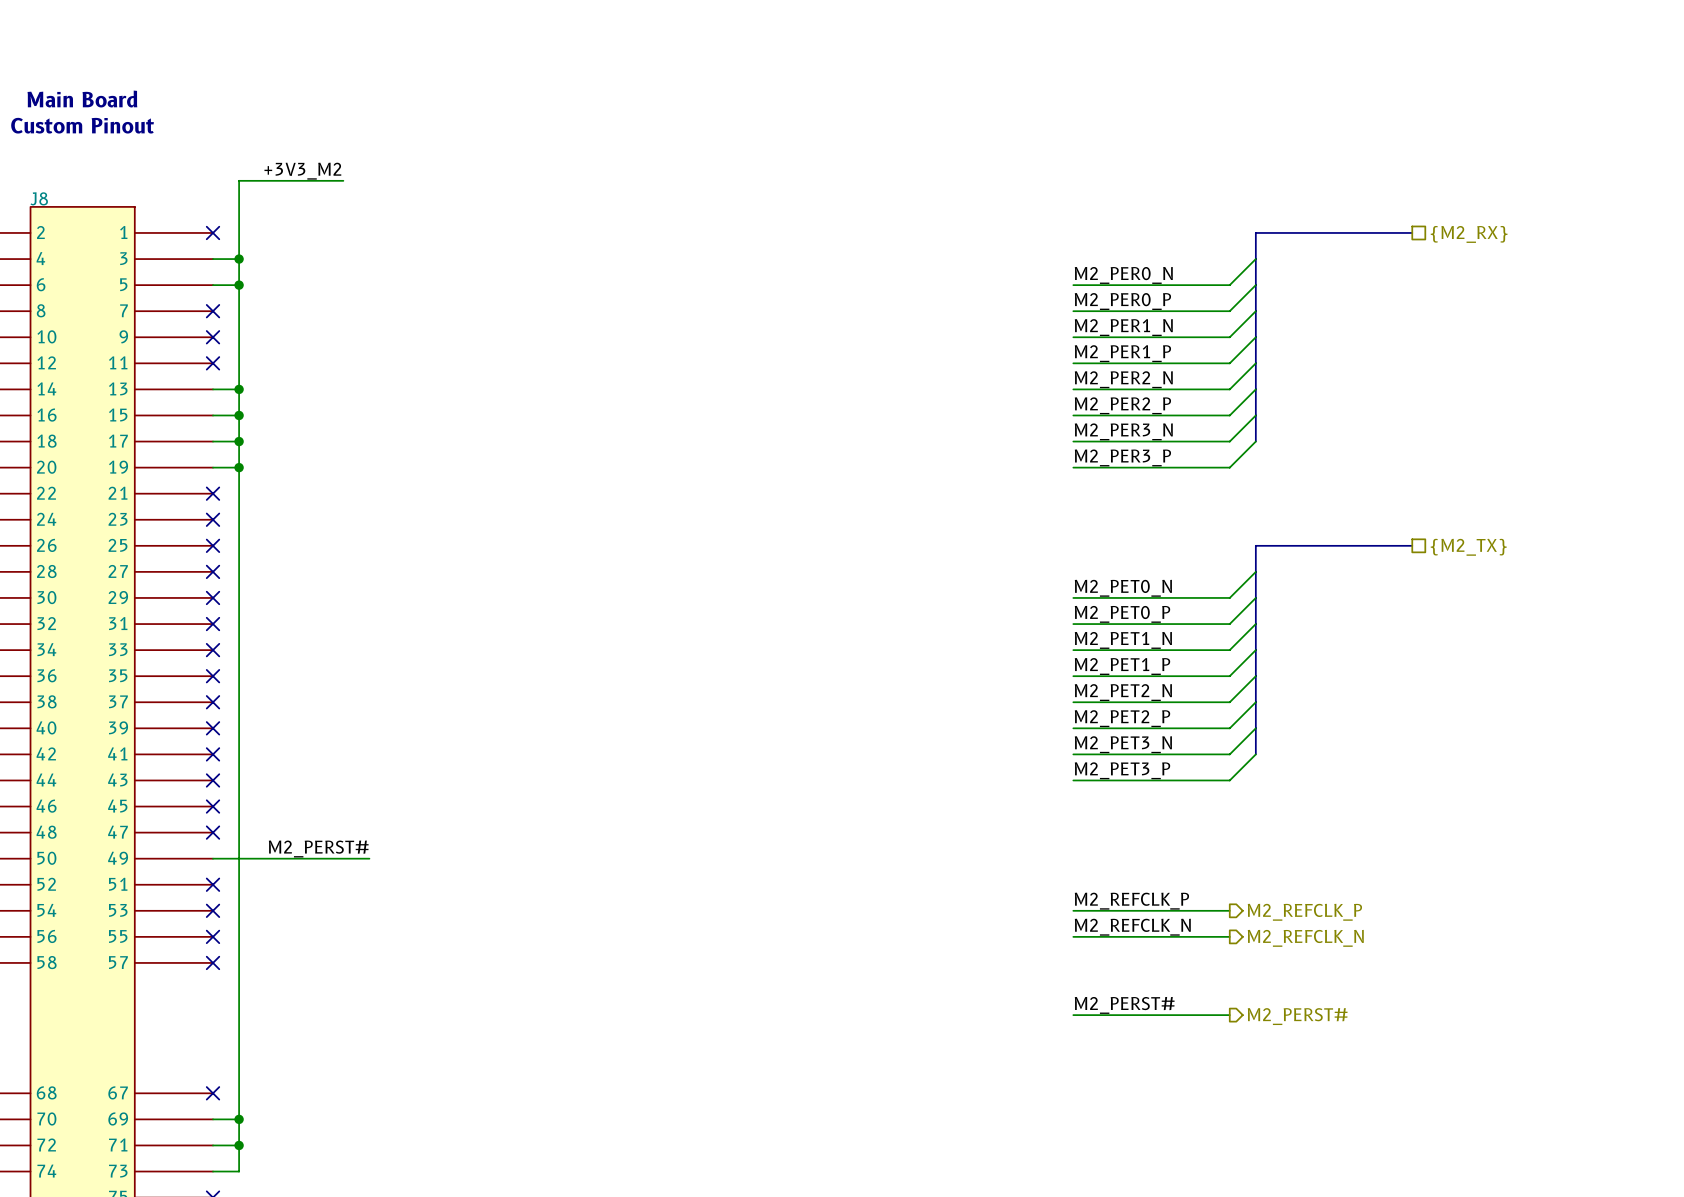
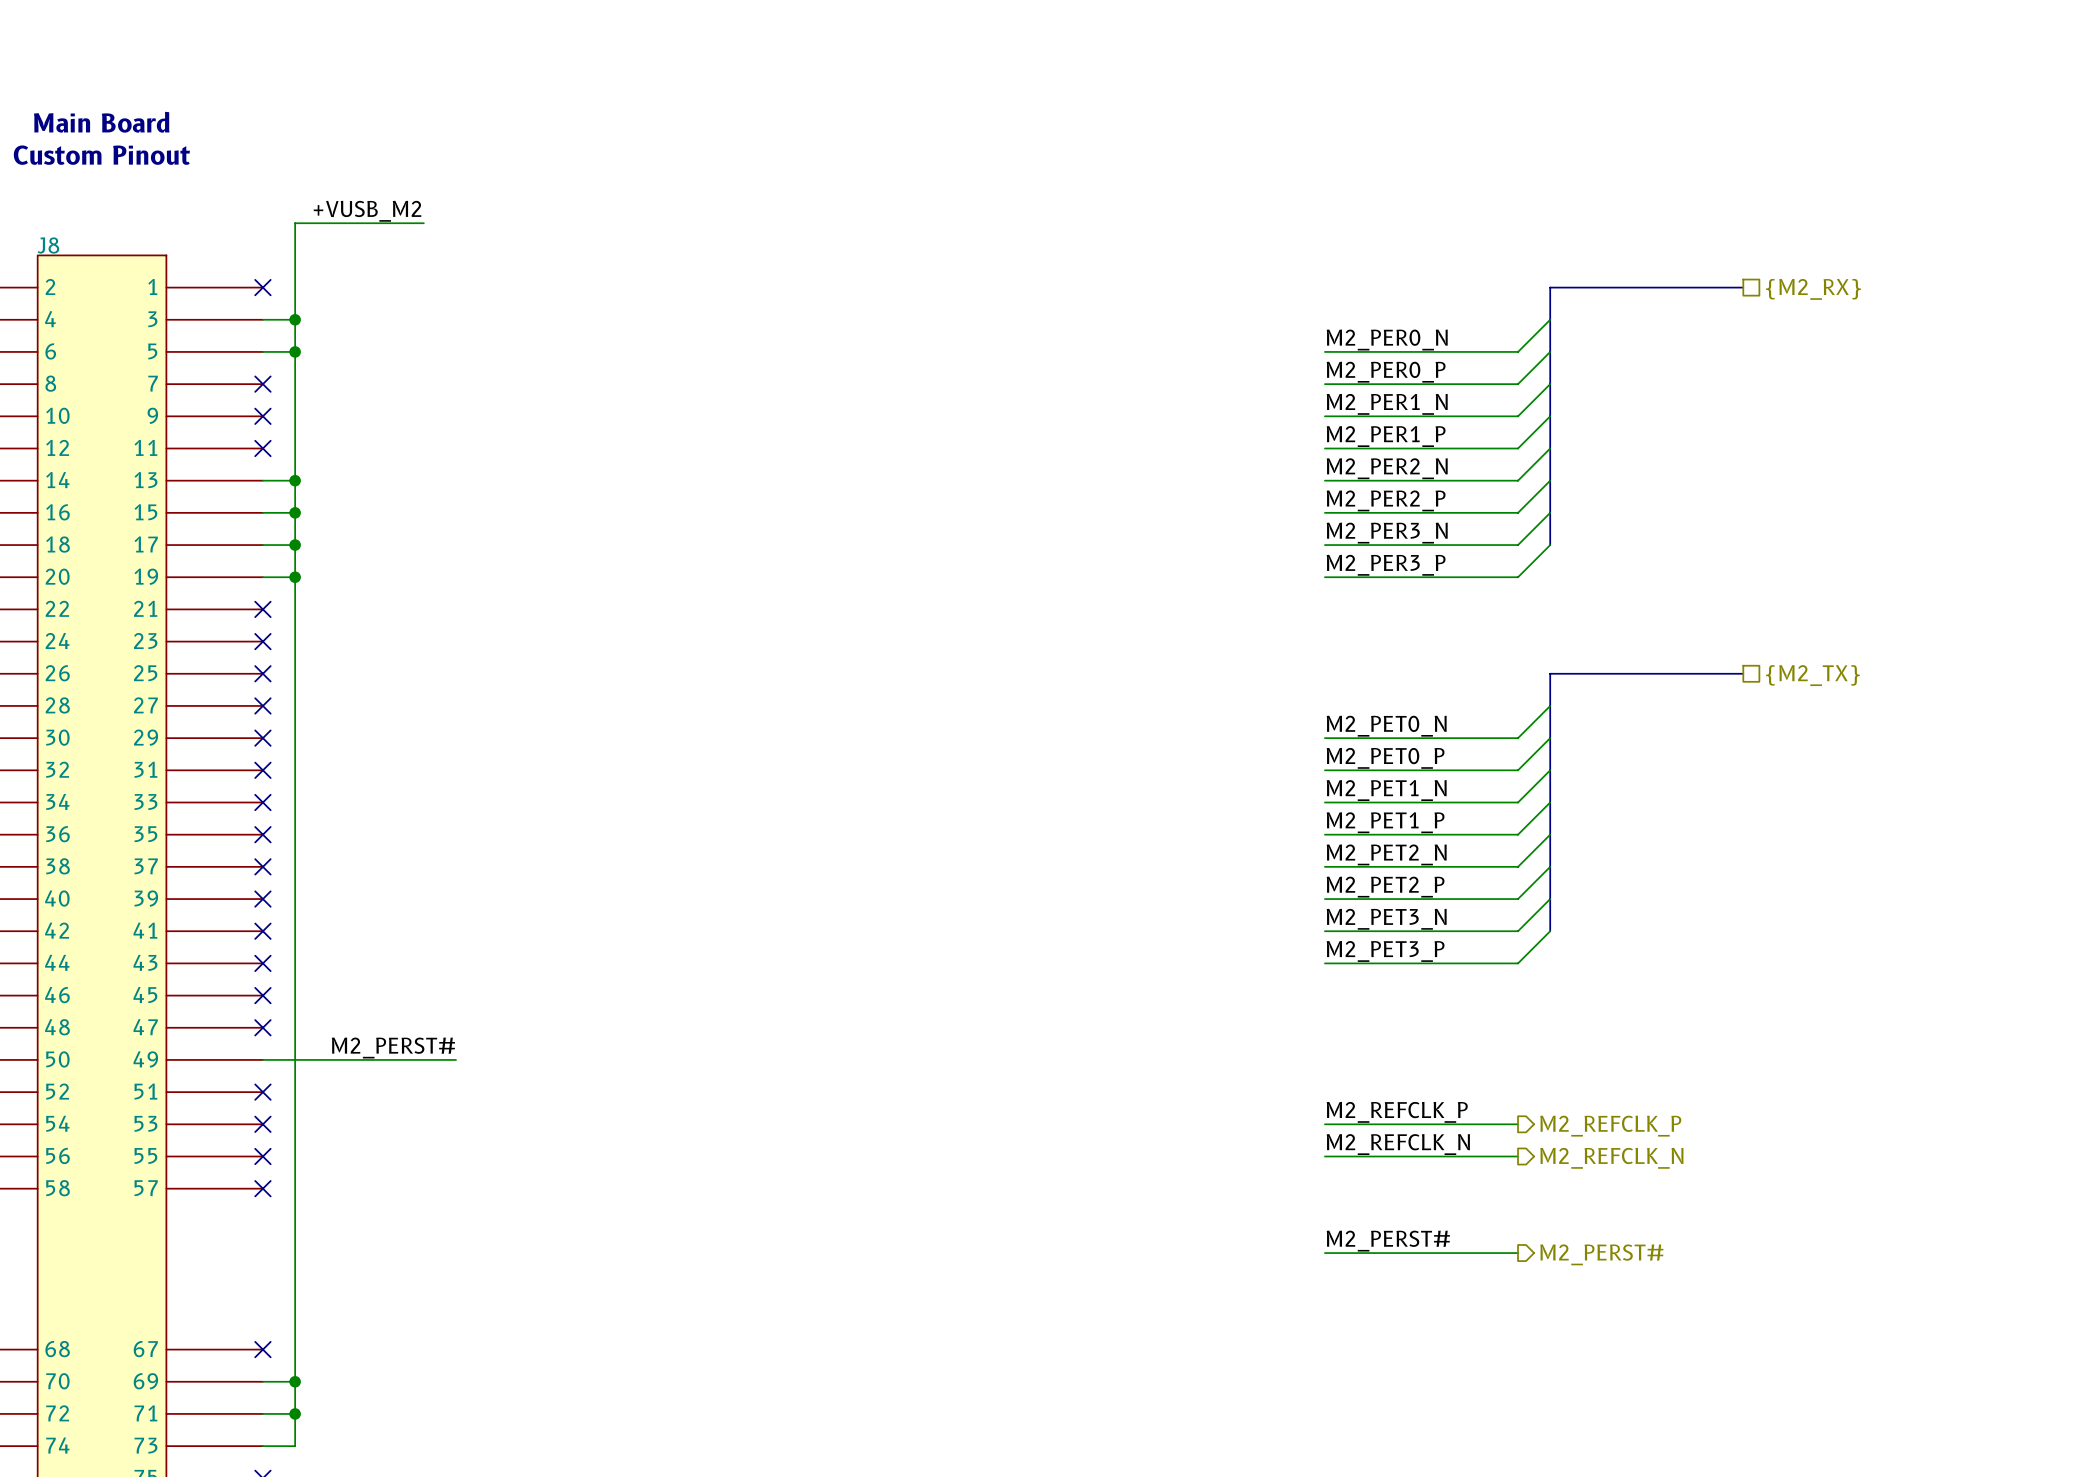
label: +3V3_M2 (302, 171) -> +VUSB_M2 (367, 211)

